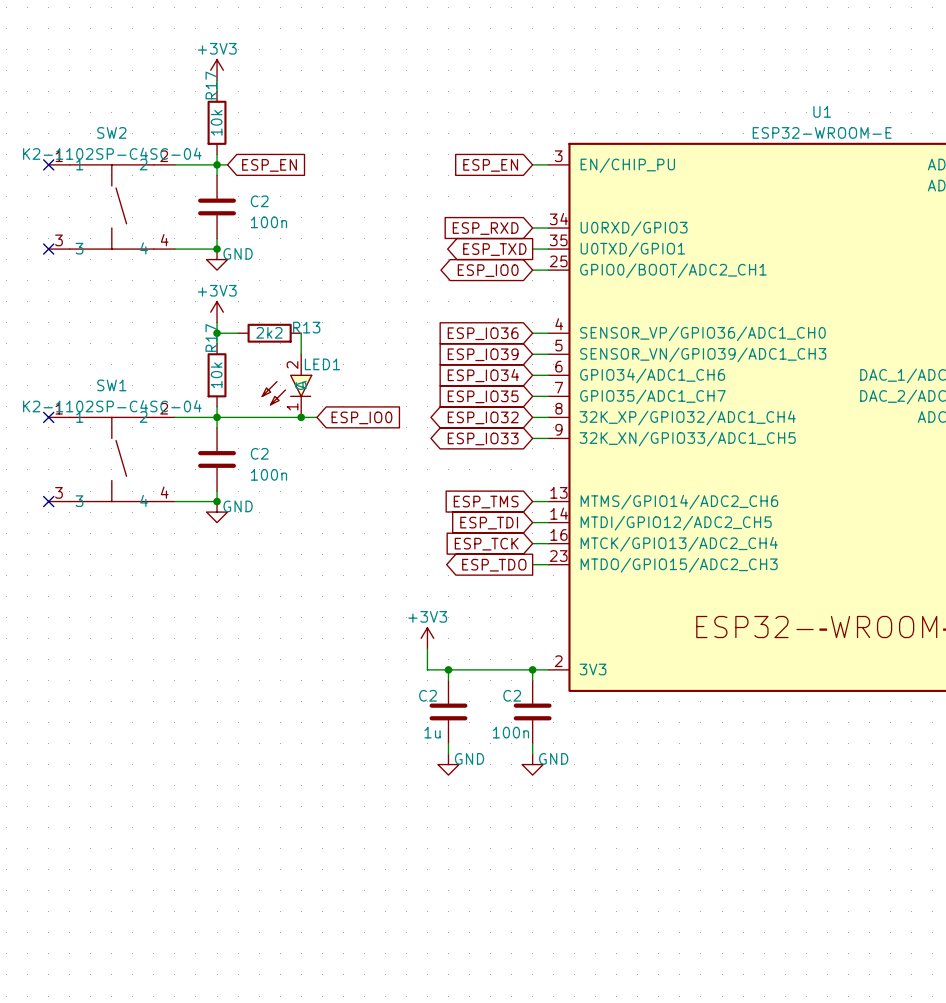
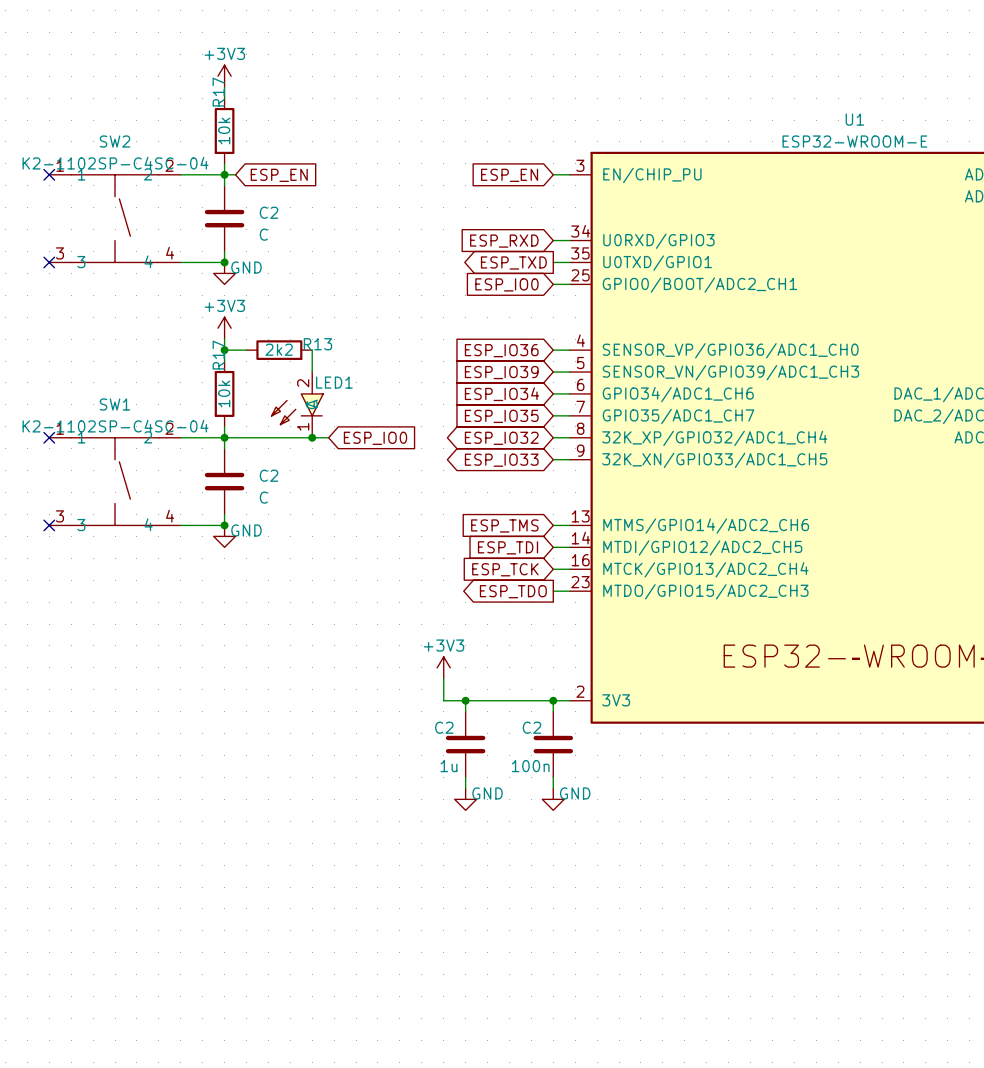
C2 value: 100n (268, 222) -> C (263, 234)
global label shape: bidirectional (488, 270) -> input (506, 284)
C2 value: 100n (268, 474) -> C (263, 497)

